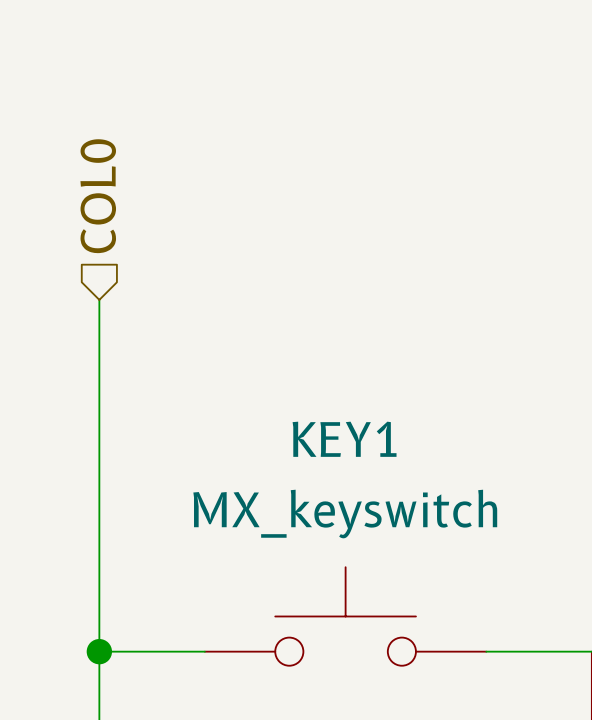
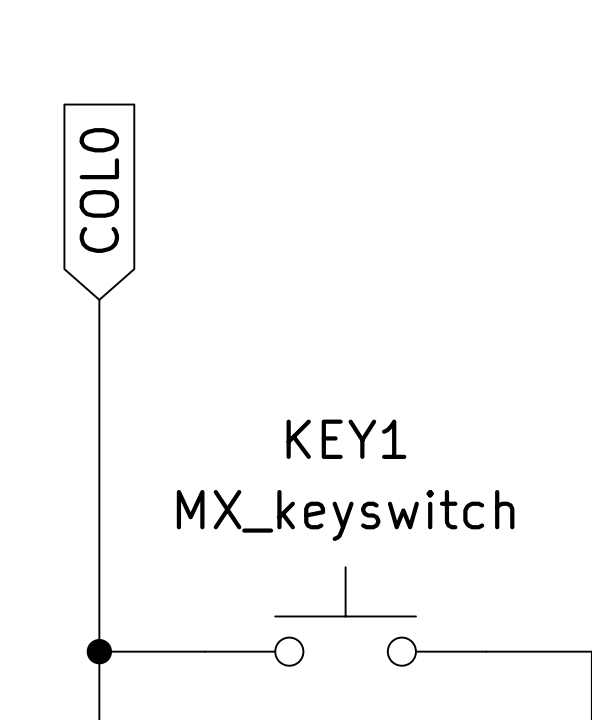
hierarchical label: COL0 (98, 196) -> none
global label: none -> COL0 (99, 190)

